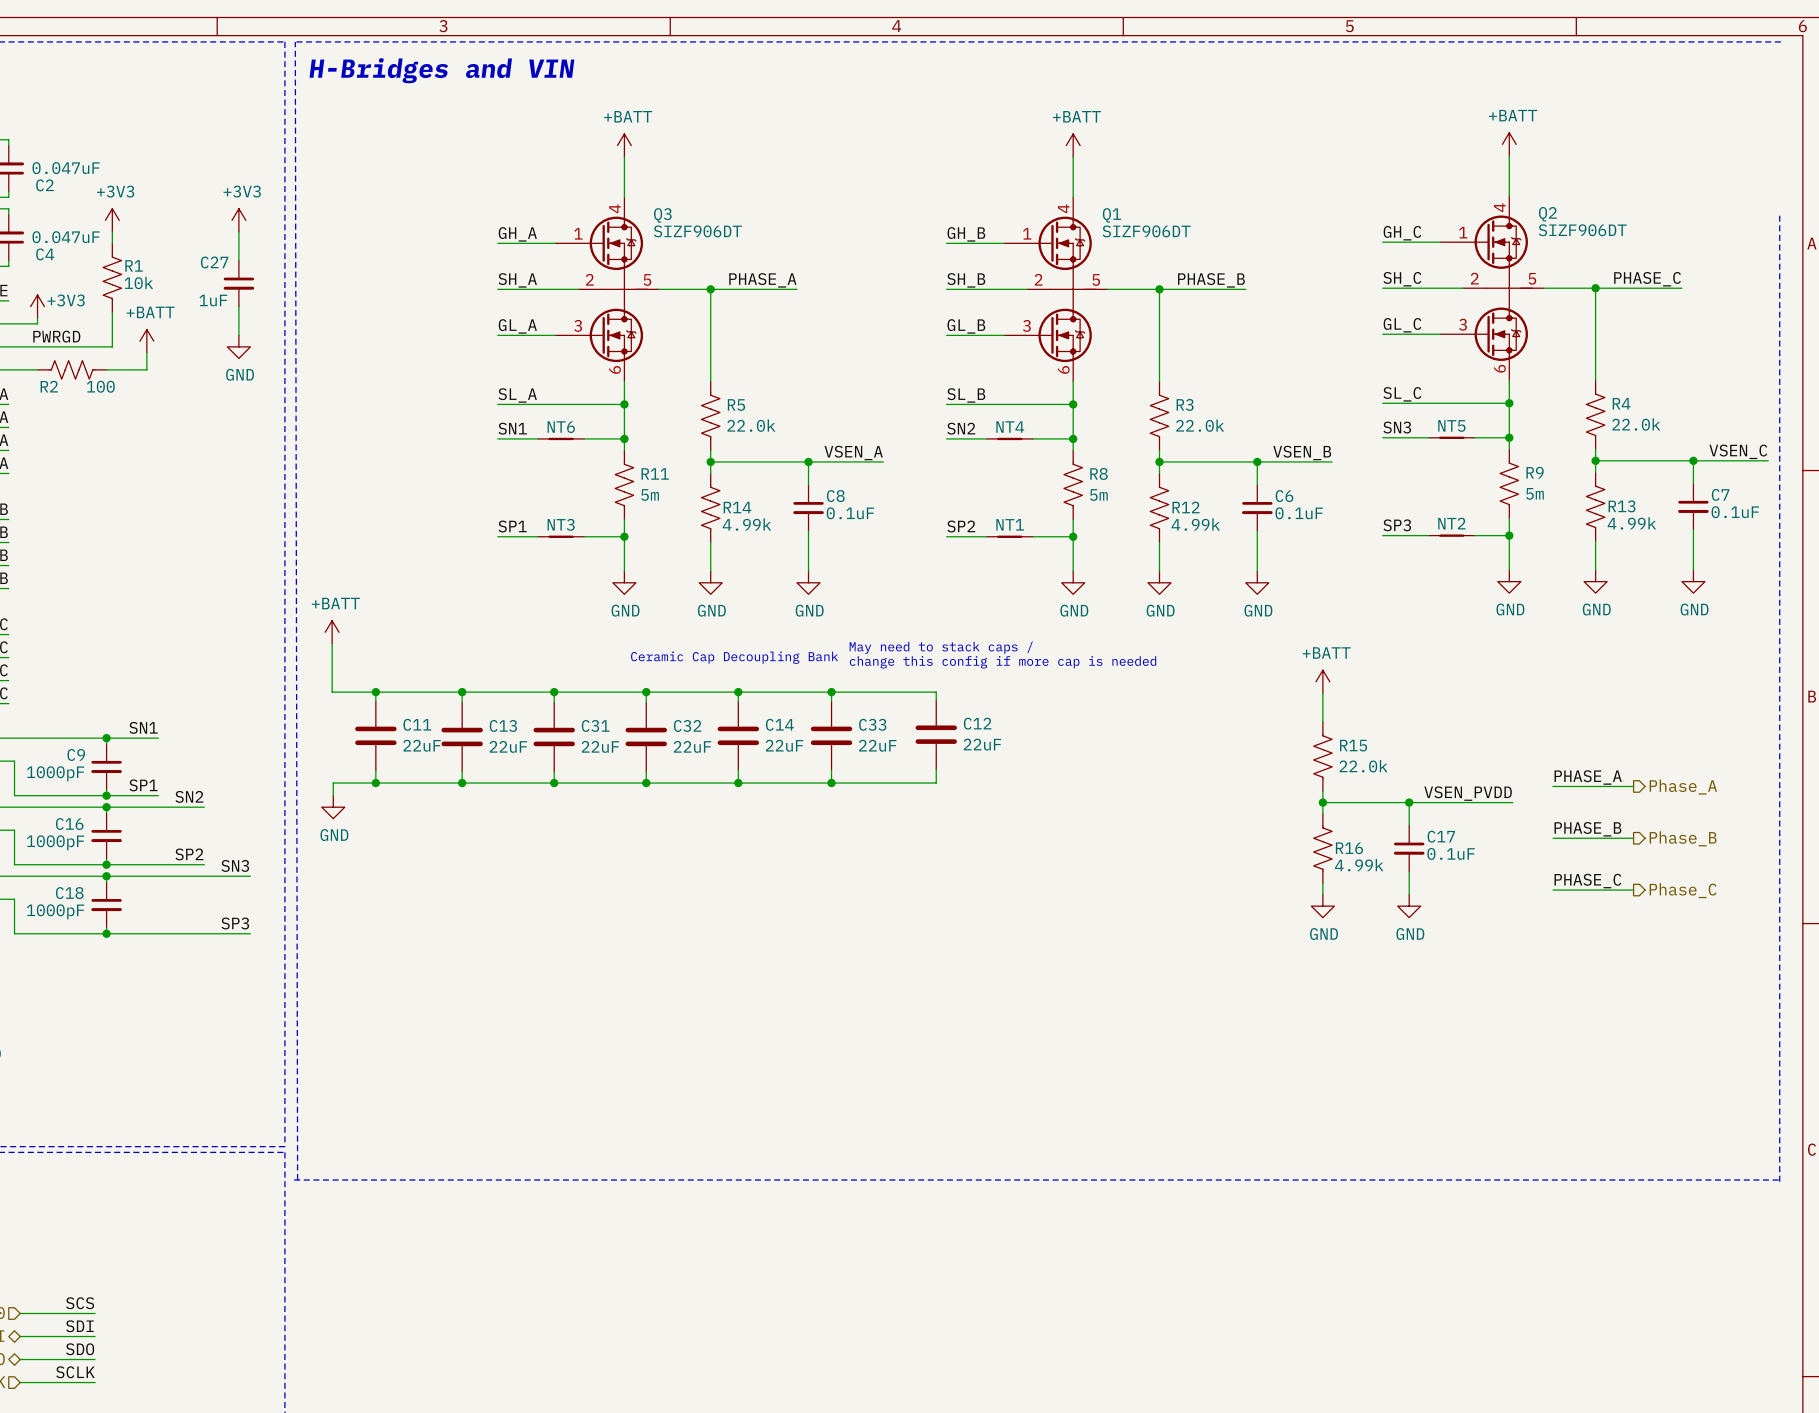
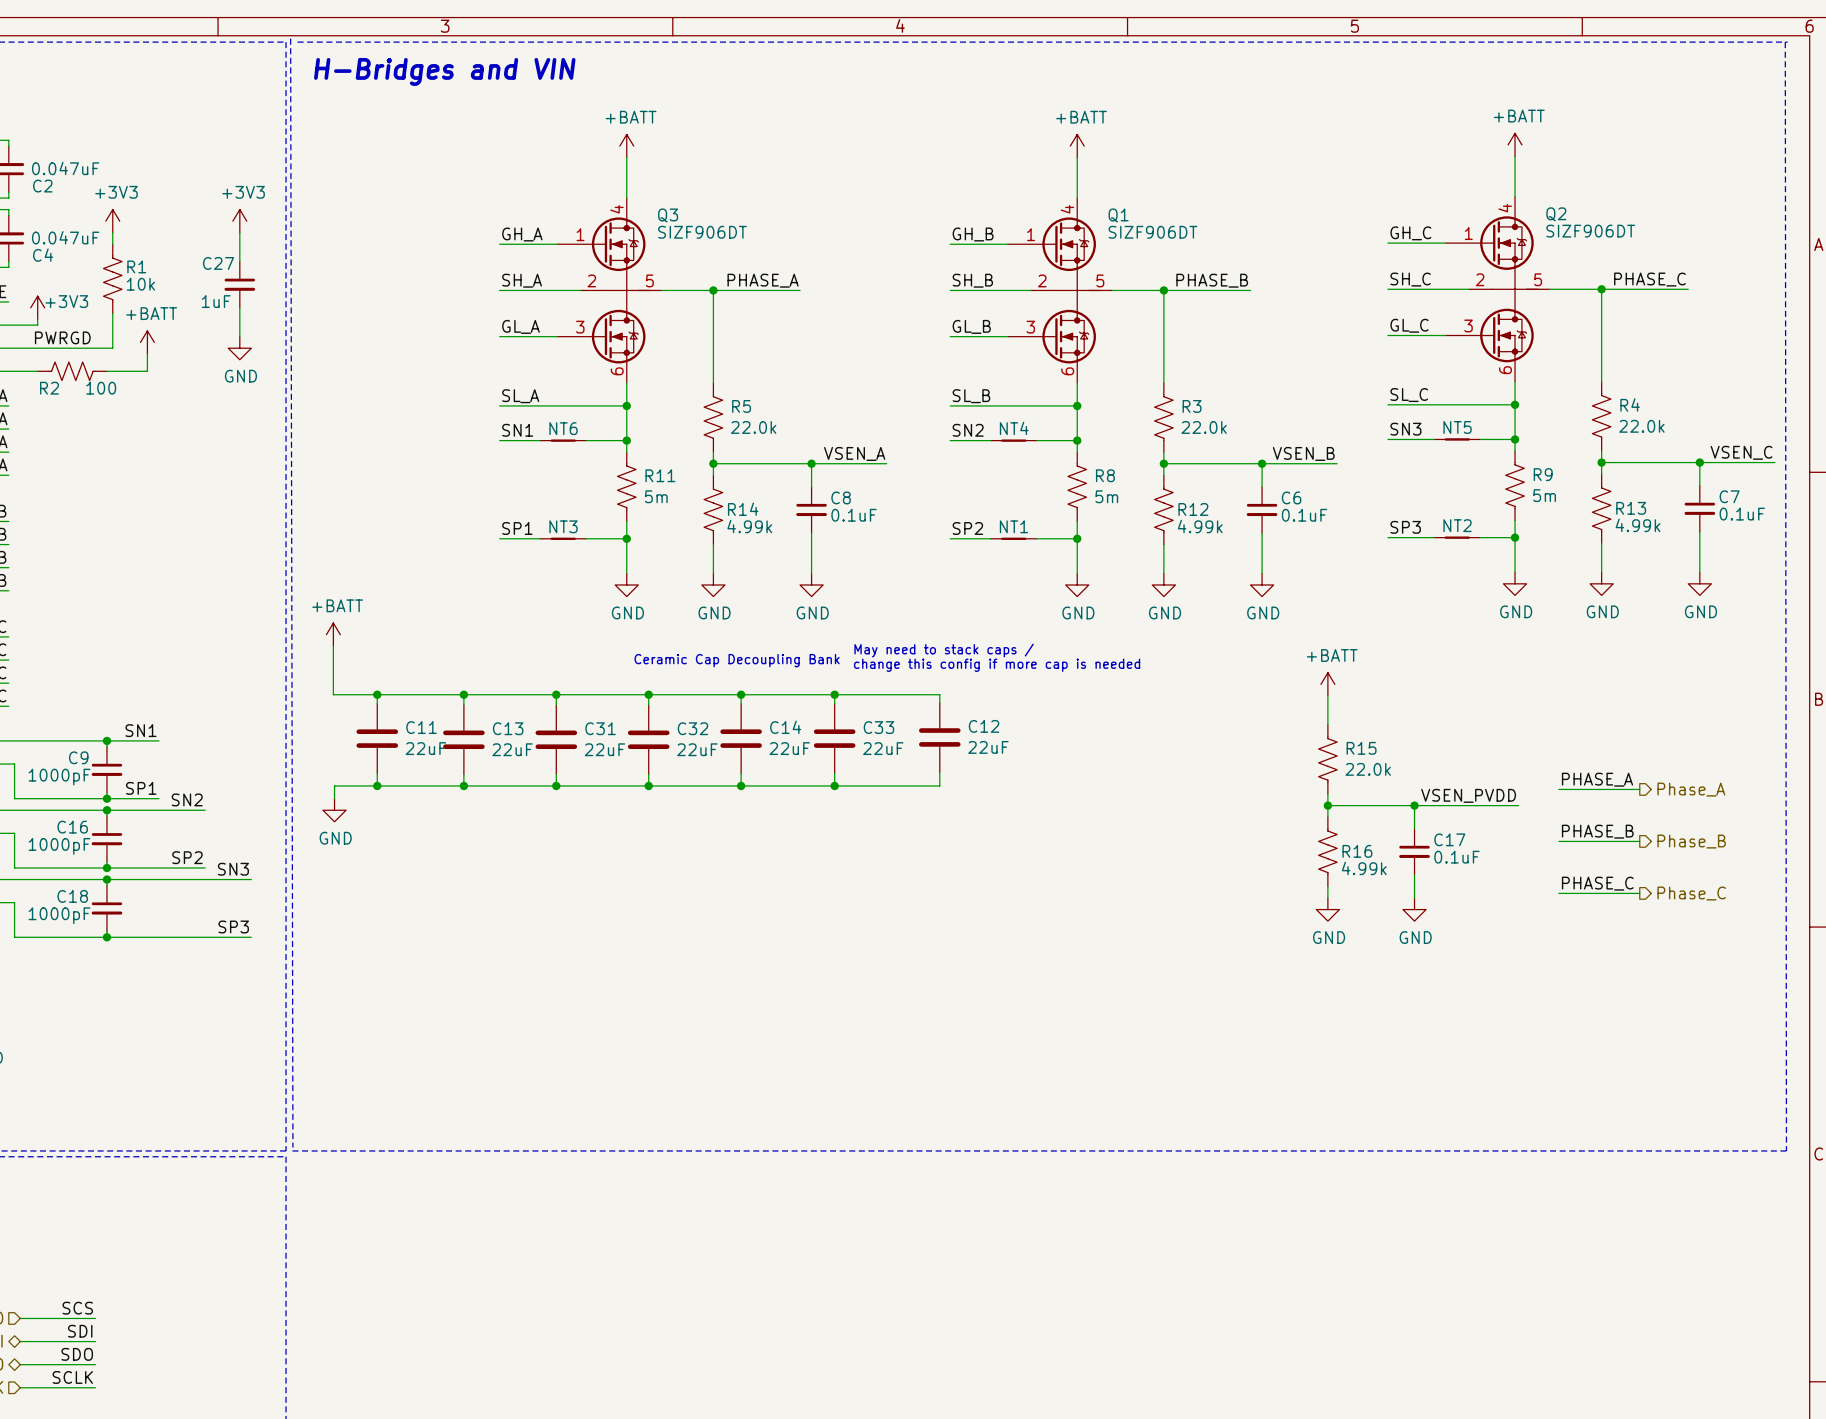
line: none -> (290, 38) (292, 1147)
line: (295, 41) (297, 1180) -> none
line: none -> (1785, 42) (1786, 1150) (290, 1150)
line: (1779, 215) (1779, 1182) -> none
line: (294, 1180) (1778, 1180) -> none

